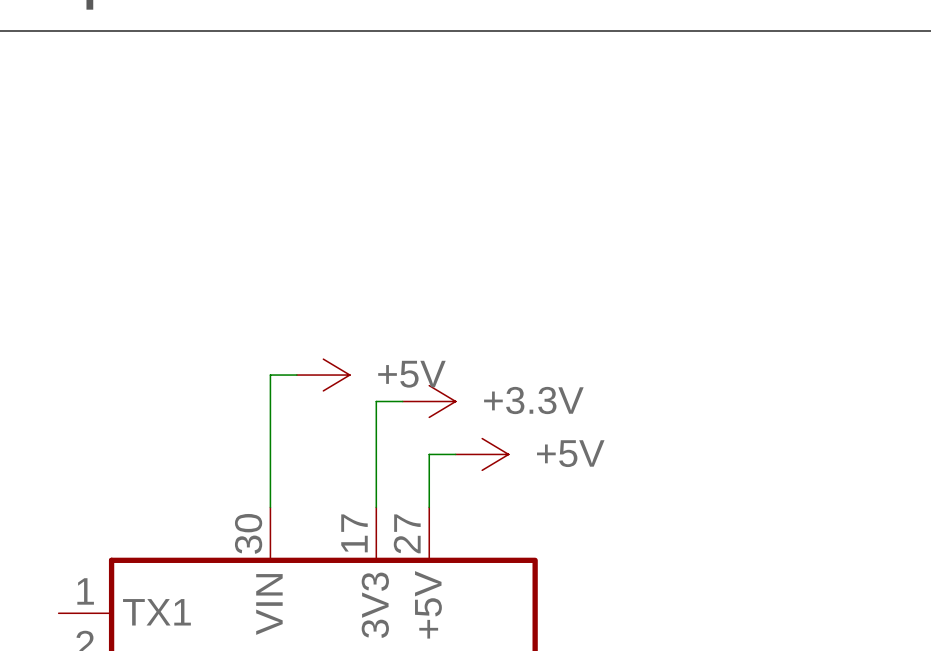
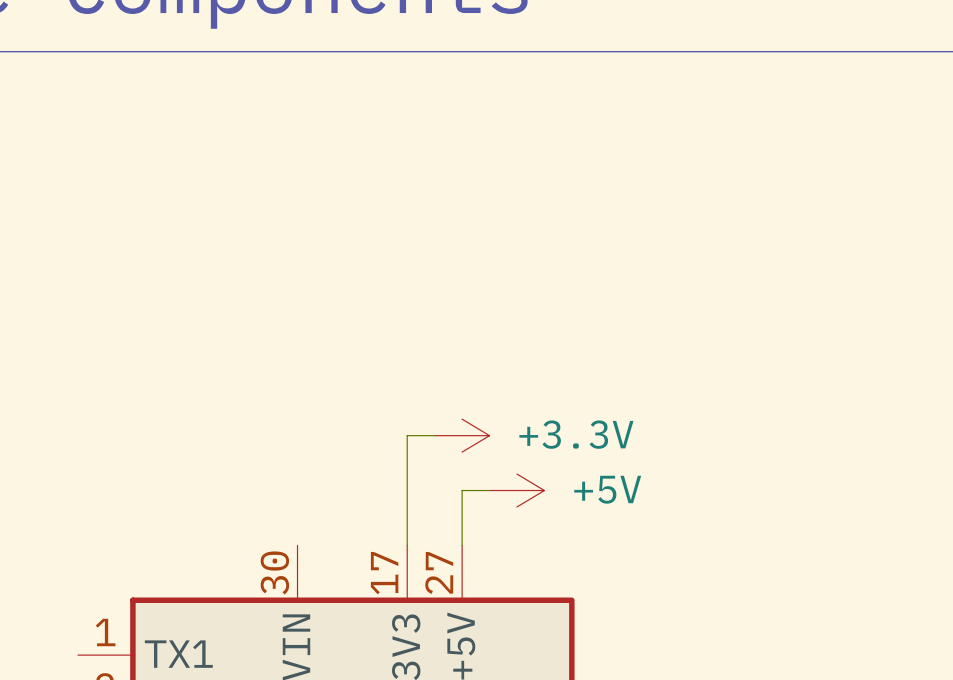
wire: (296, 375) (270, 375) (270, 507) -> none
power symbol: +5V (323, 375) -> none

